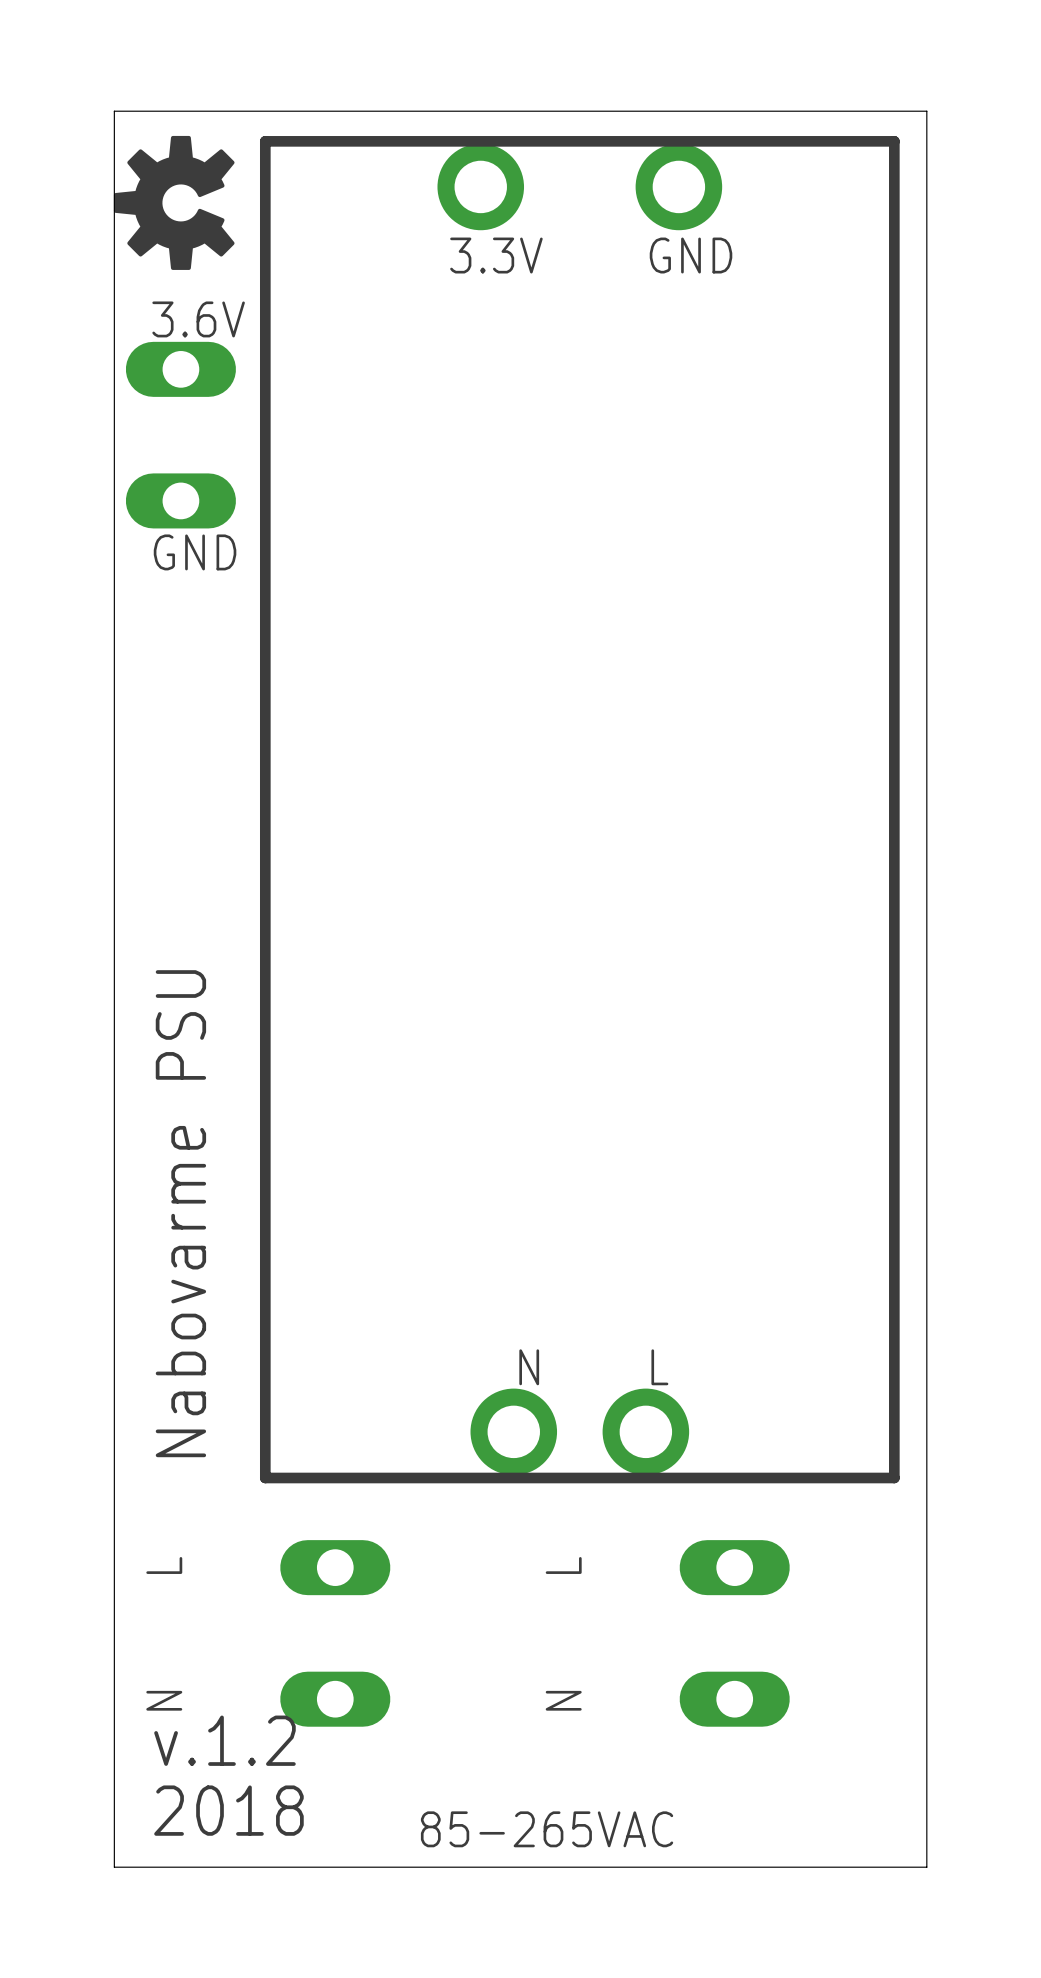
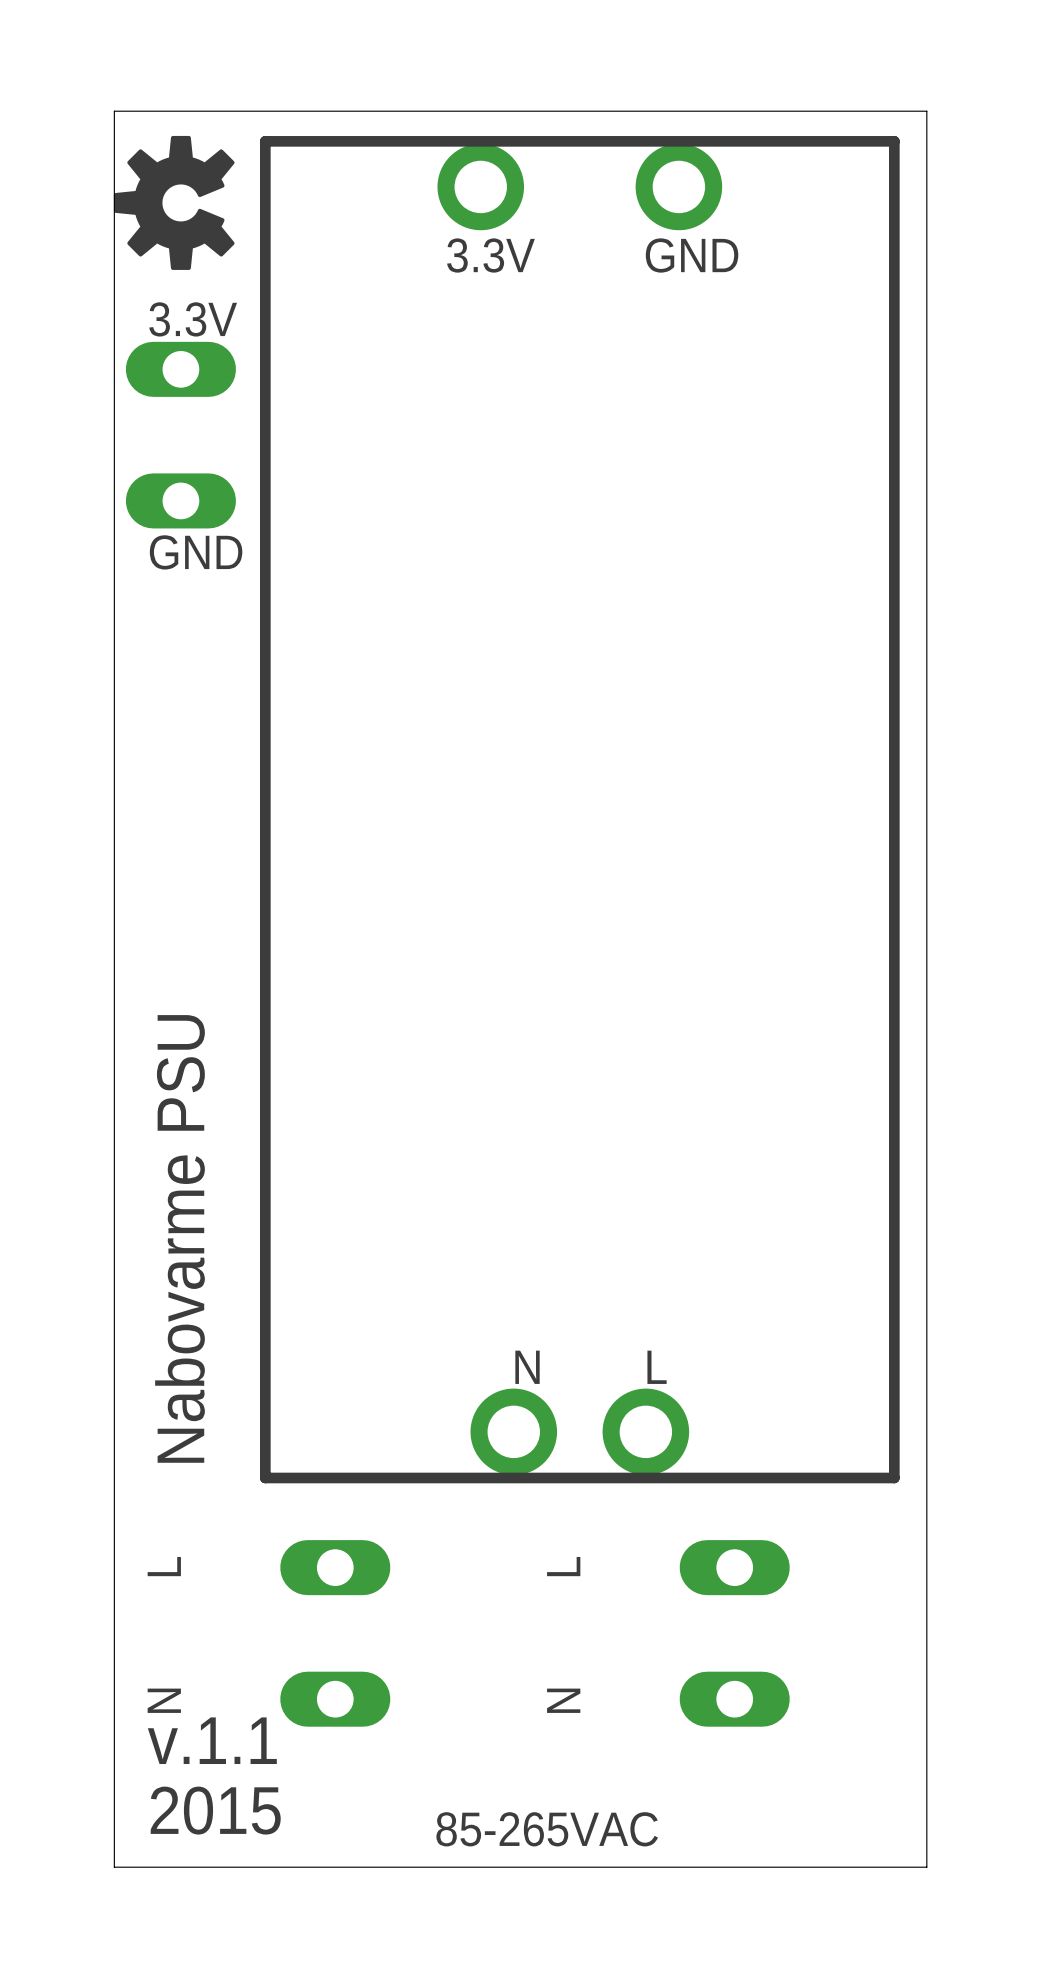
text: 3.6V (198, 319) -> 3.3V (193, 319)
text: v.1.2 (224, 1740) -> v.1.1 (212, 1740)
text: 2018 (228, 1810) -> 2015 (215, 1810)

